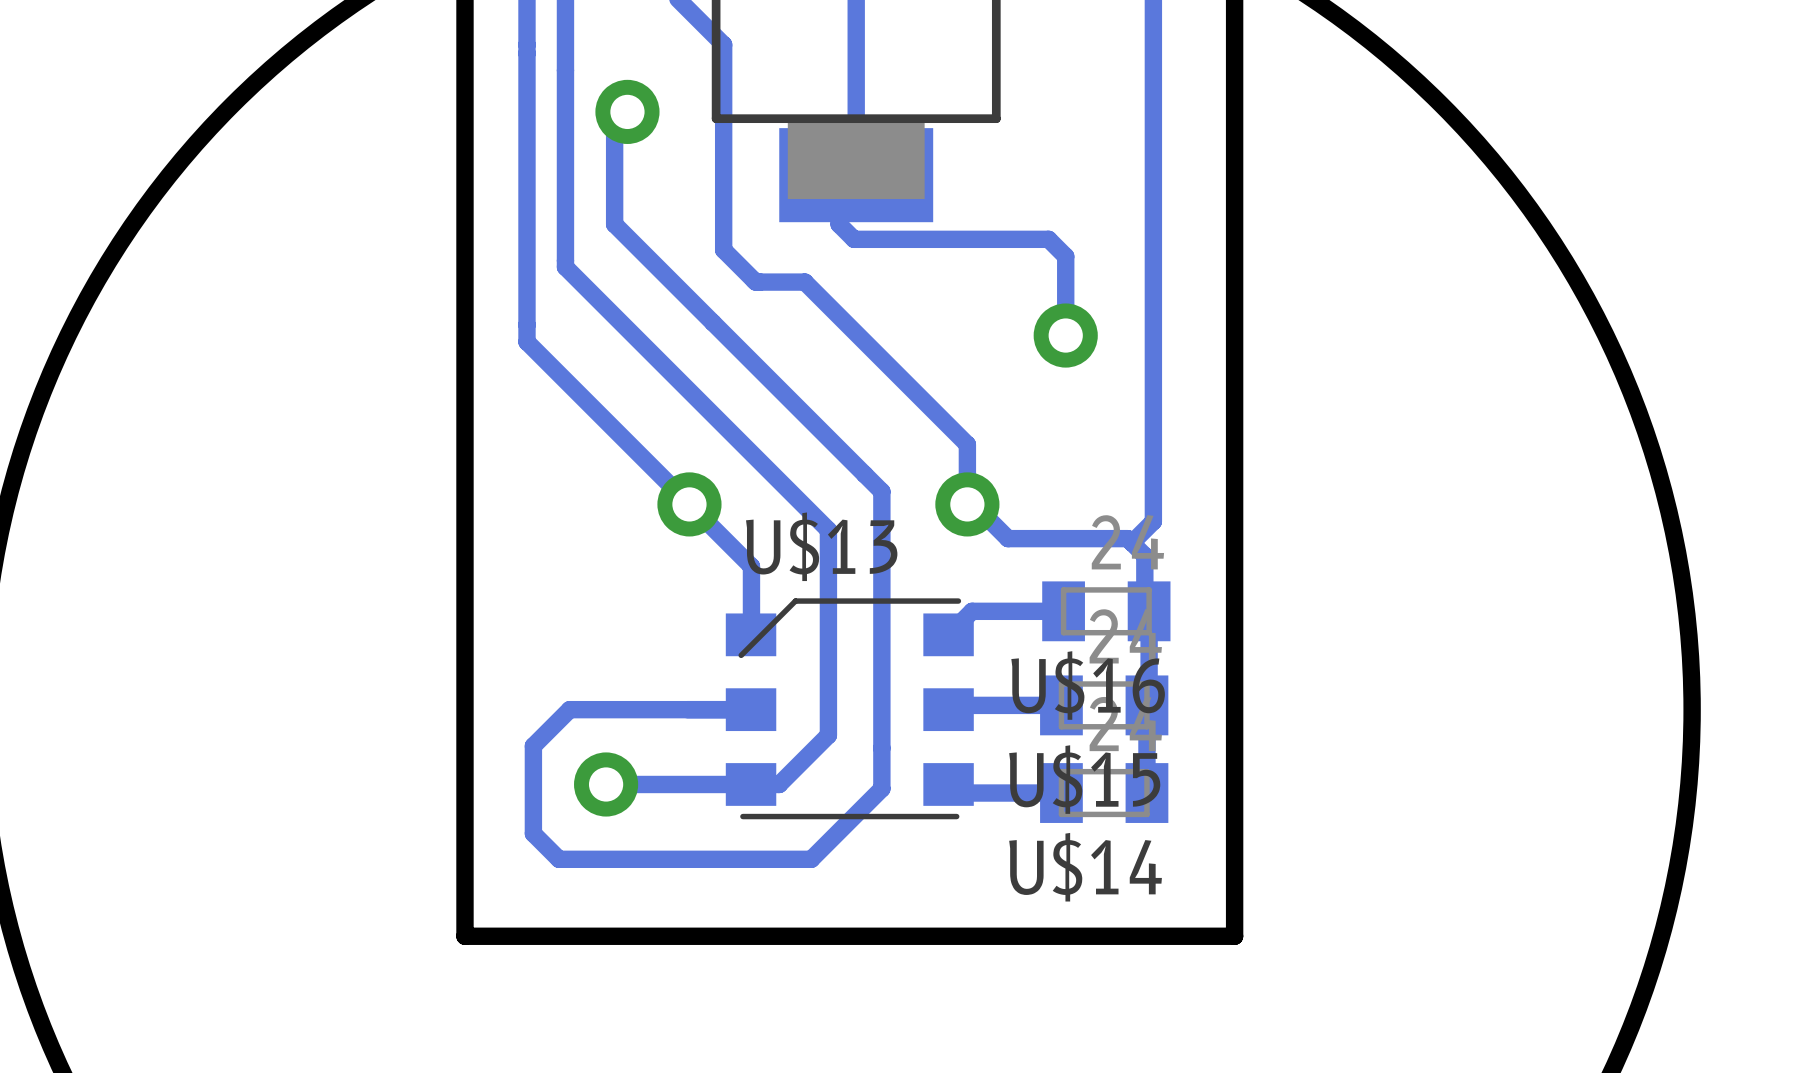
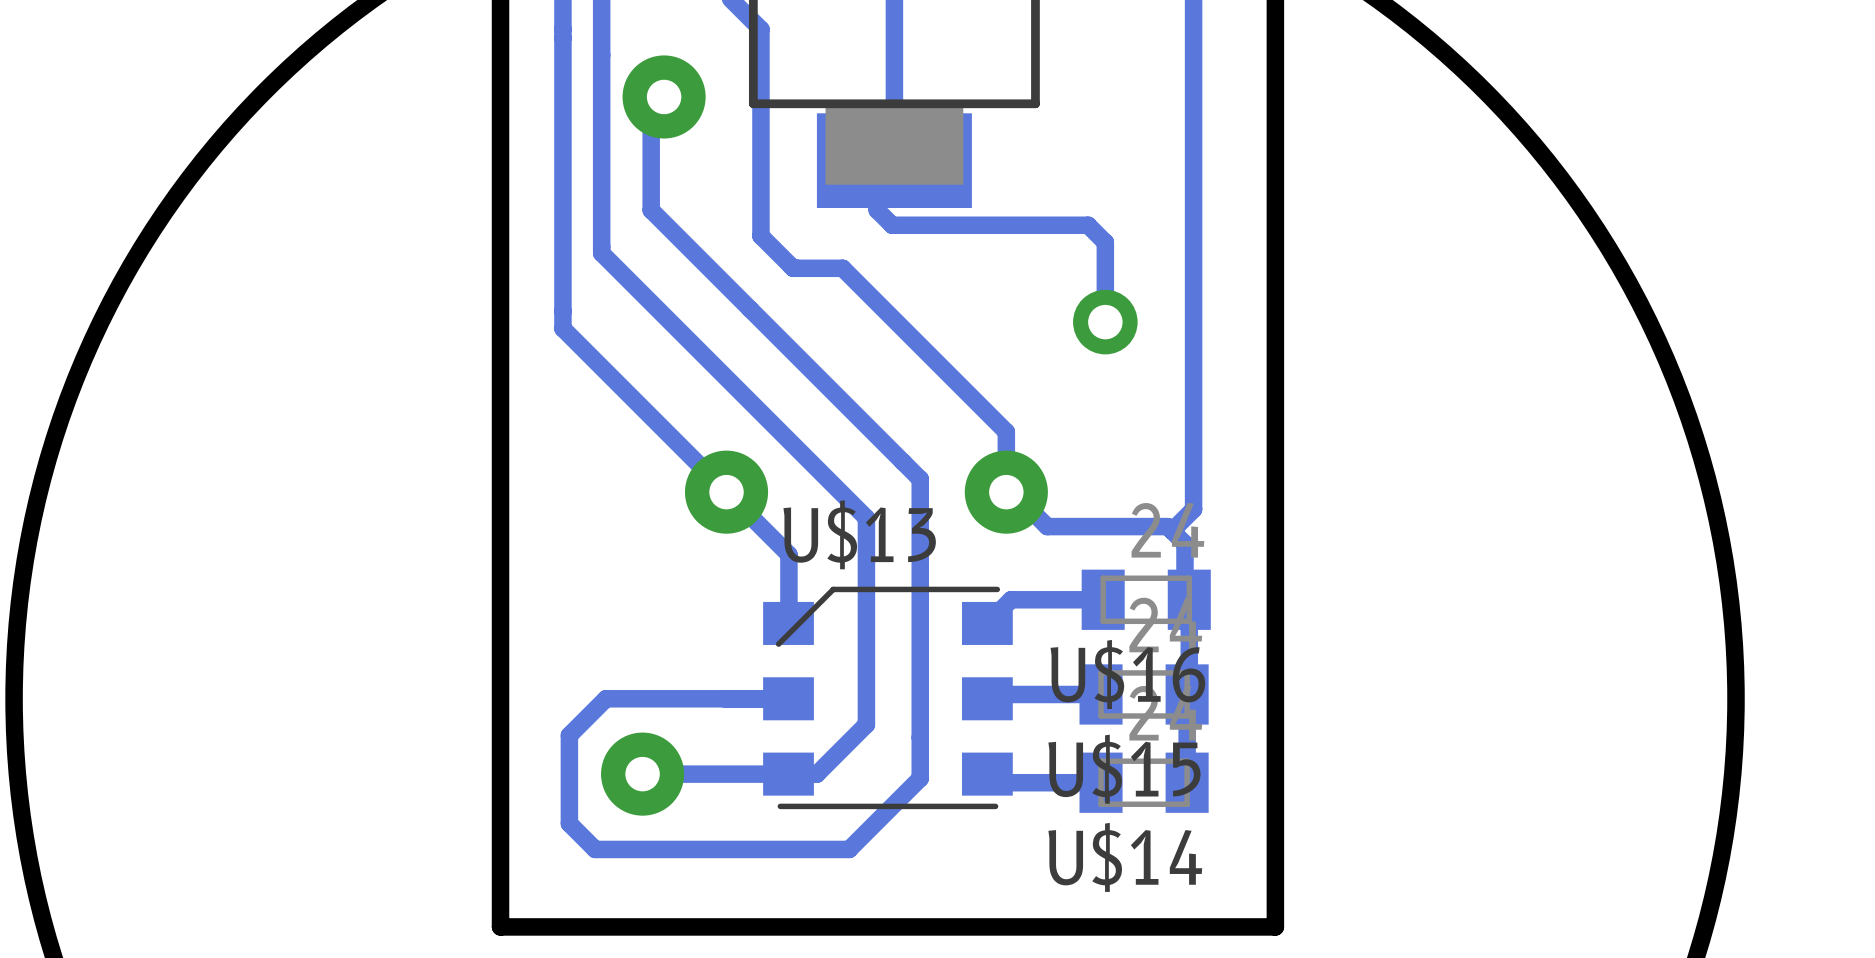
via size: [595, 79, 660, 144] -> [622, 55, 706, 139]
via size: [657, 472, 722, 537] -> [684, 450, 769, 534]
via size: [935, 472, 1000, 537] -> [964, 450, 1048, 534]
via size: [574, 752, 639, 817] -> [601, 732, 685, 816]

